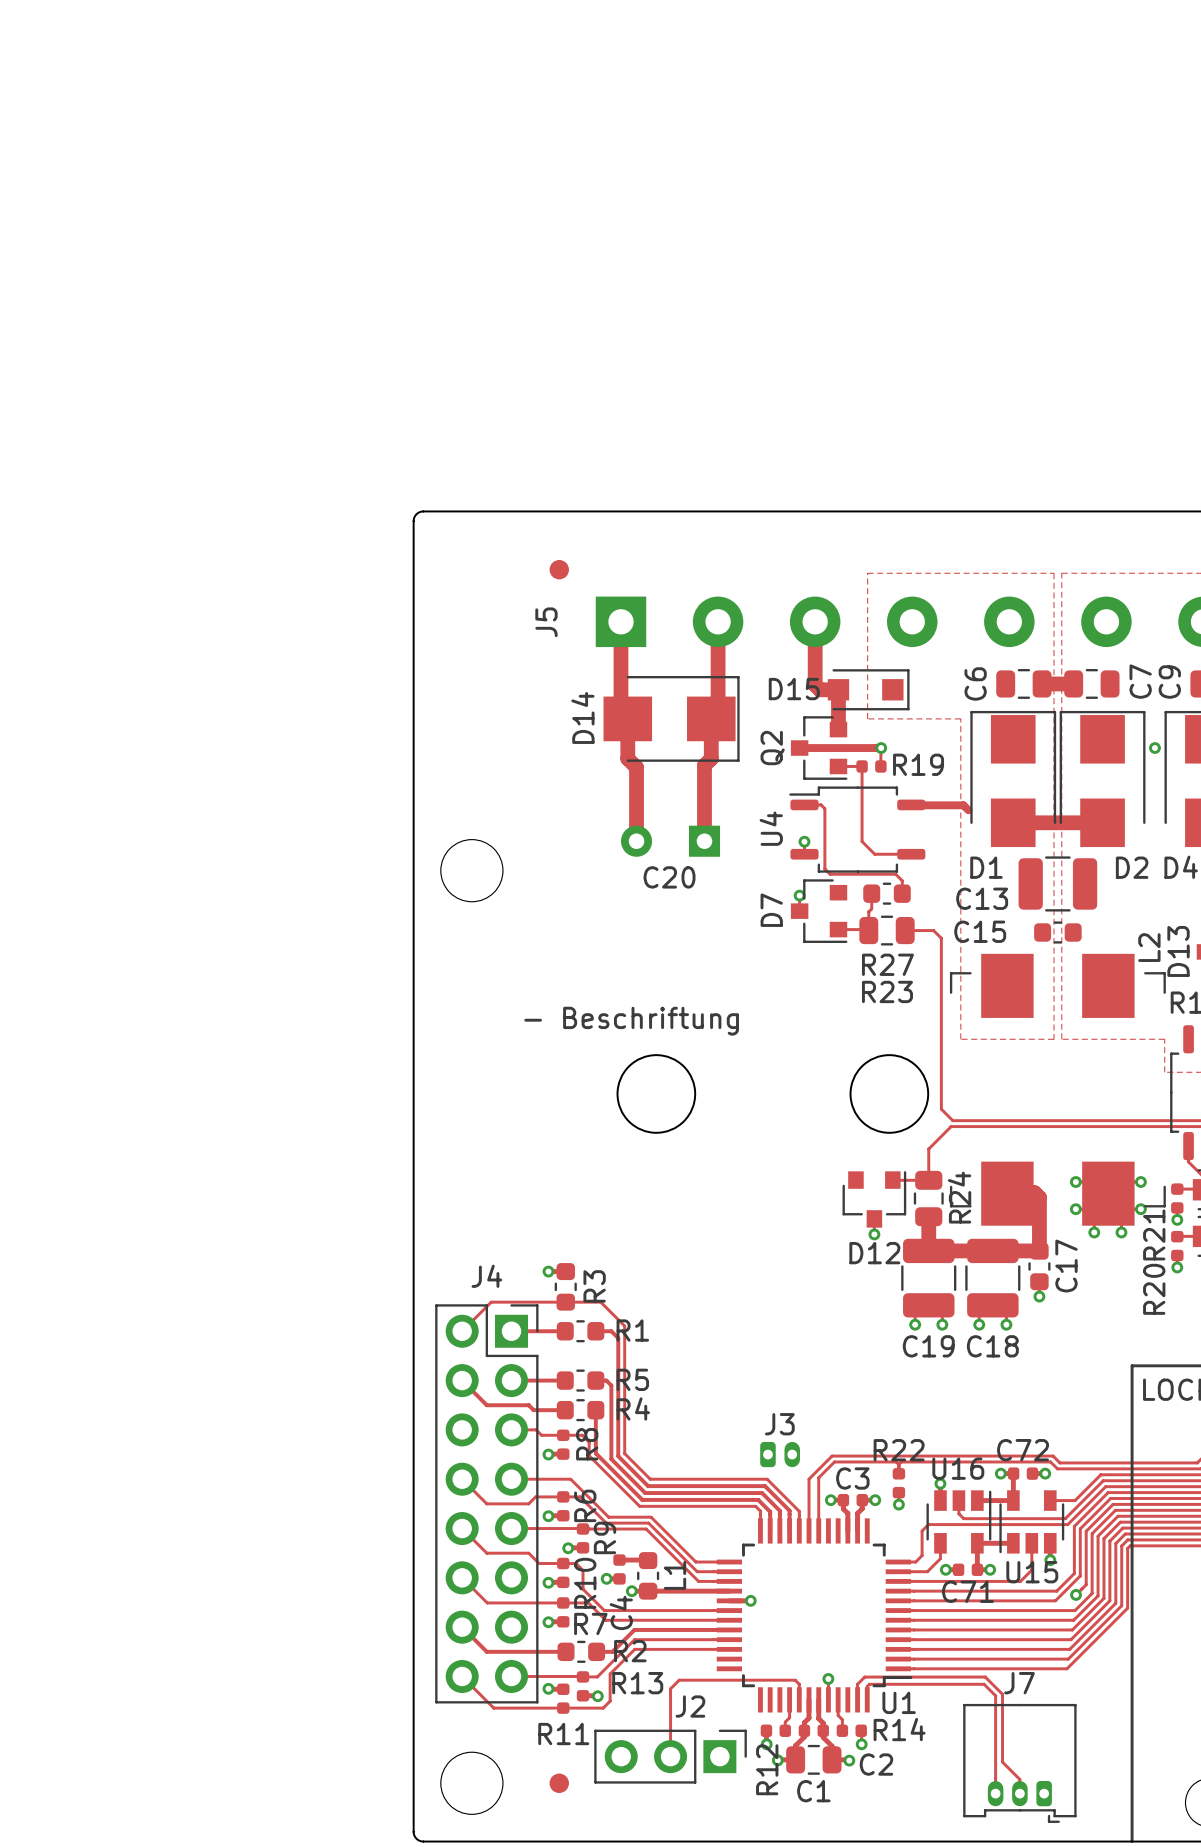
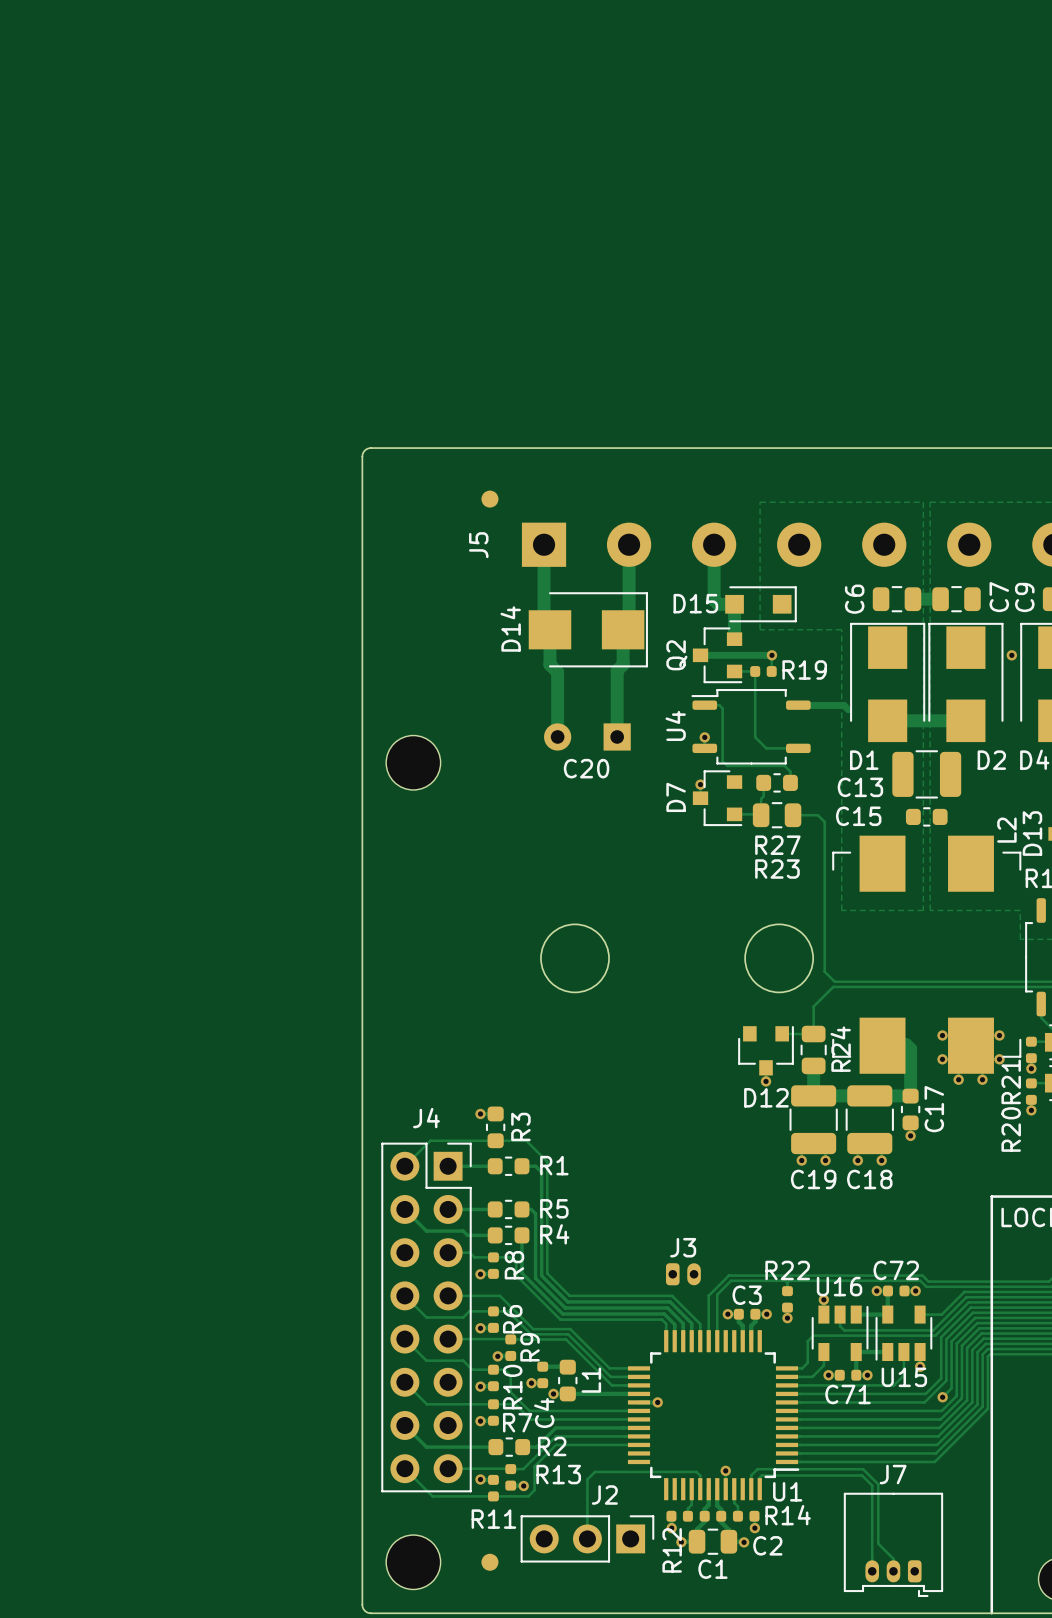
text: - Beschriftung (631, 1021) -> none

